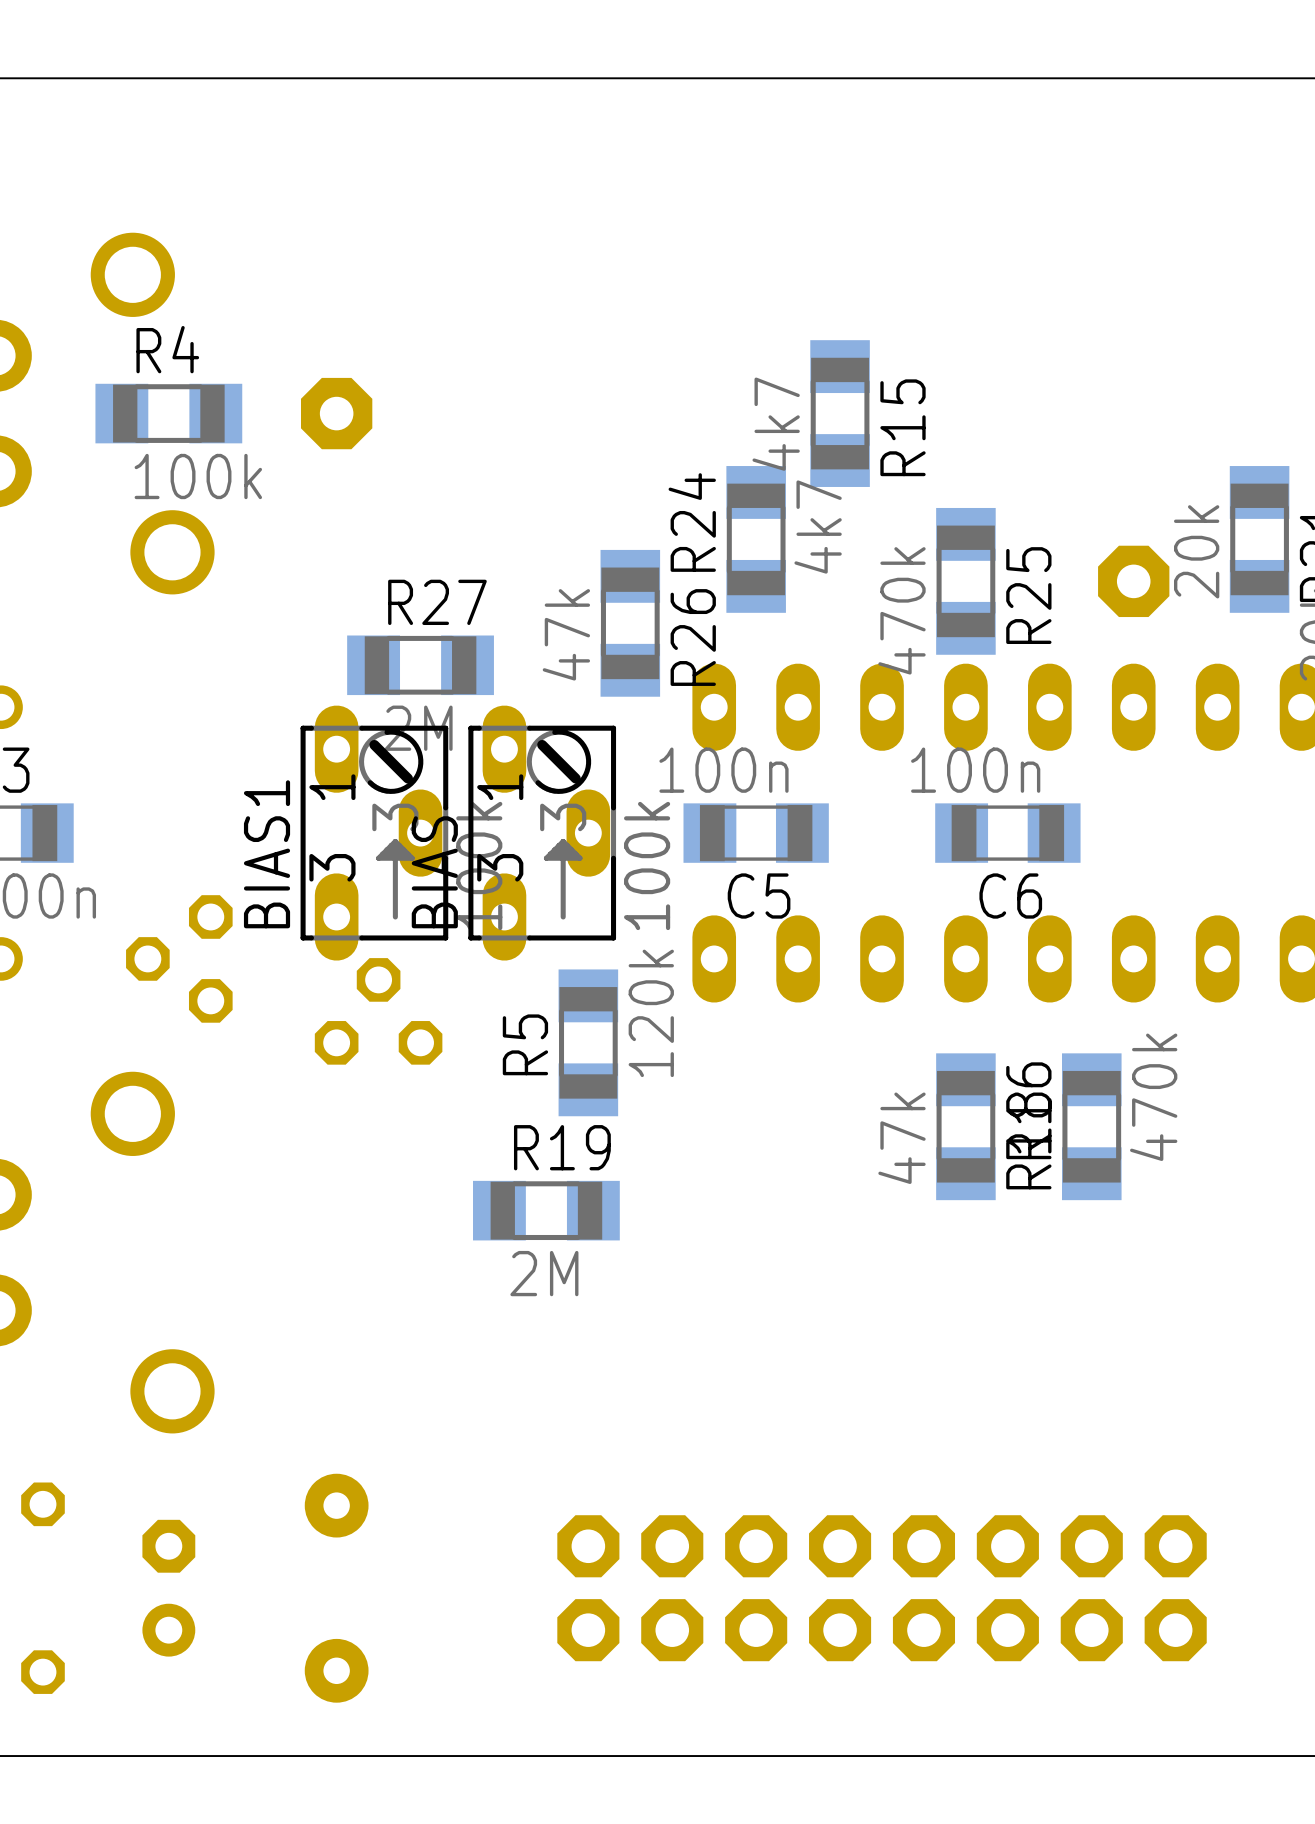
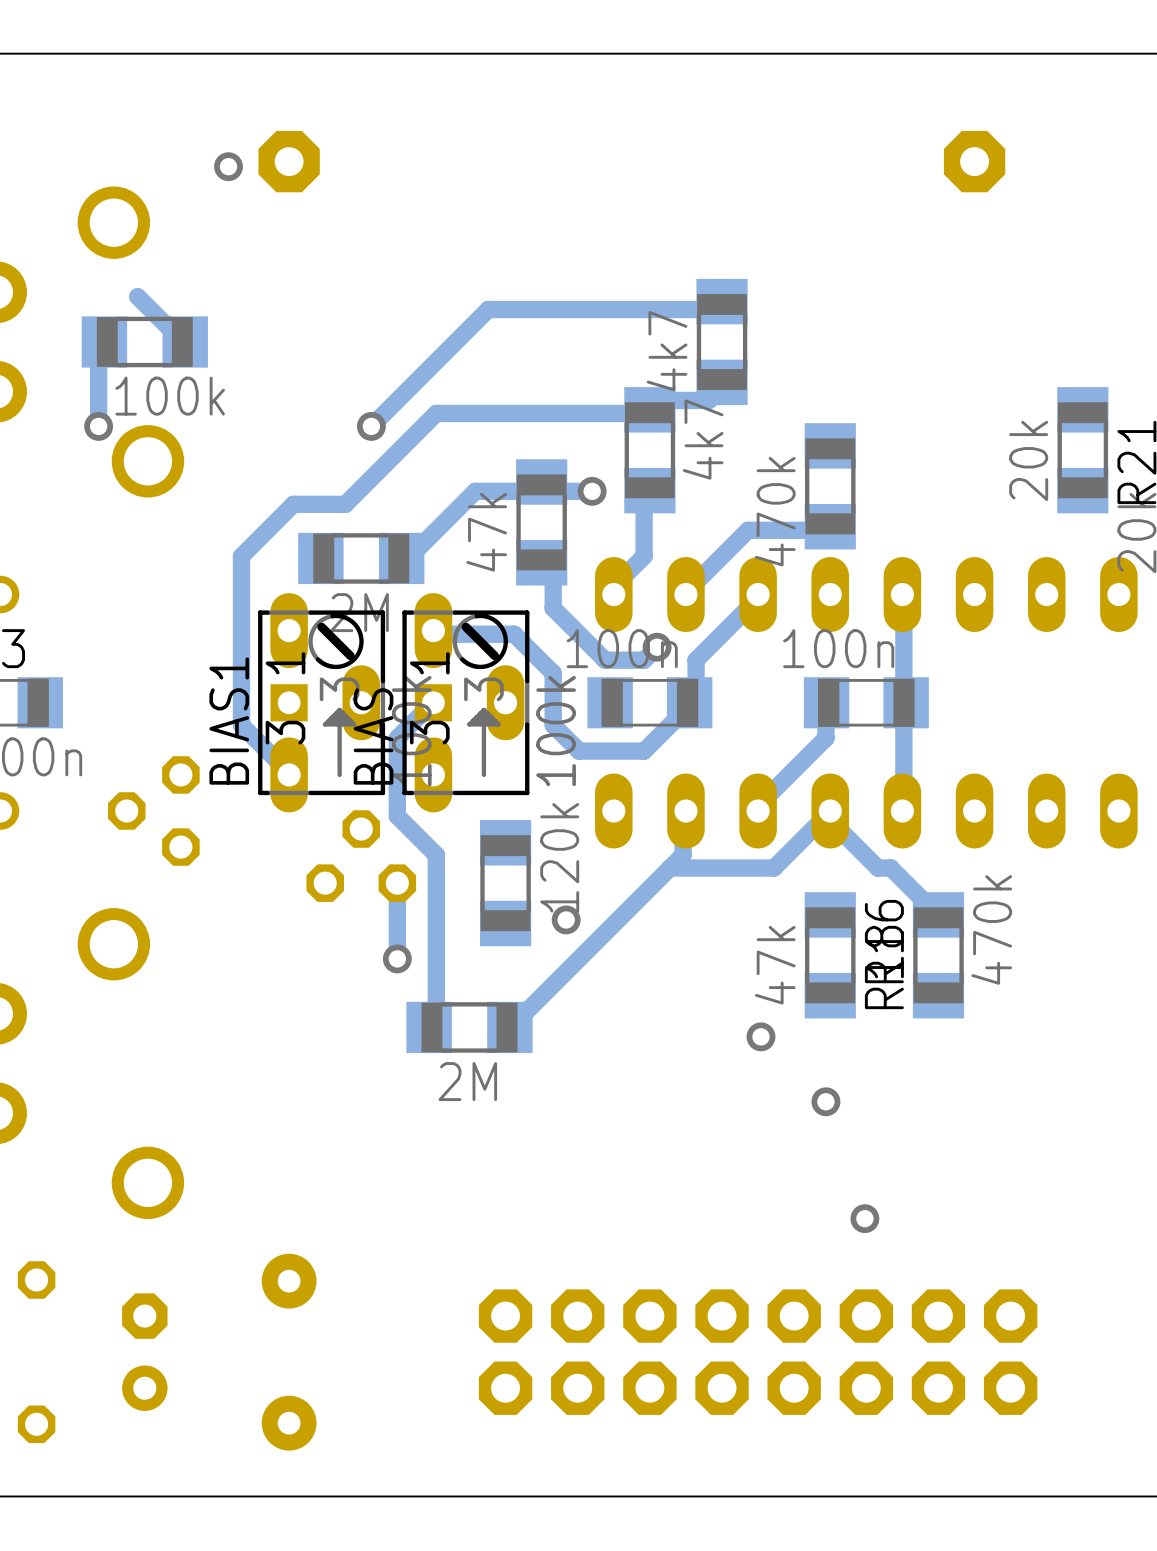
via: none -> (228, 166)
R4 name: R4 (167, 349) -> none
track: none -> (137, 296) (185, 342)
track: none -> (722, 301) (722, 309) (488, 309) (371, 426)
track: none -> (104, 342) (98, 348) (98, 426)
part position: (336, 413) -> (289, 161)
R15 name: R15 (902, 427) -> none
track: none -> (722, 382) (722, 387) (709, 400) (657, 400) (649, 409) (644, 413) (436, 413) (345, 504) (293, 504) (241, 556) (241, 725) (289, 774)
via: none -> (98, 426)
via: none -> (371, 426)
R24 name: R24 (692, 522) -> none
part position: (1133, 581) -> (974, 161)
track: none -> (649, 490) (644, 491) (644, 556) (618, 582) (613, 594)
track: none -> (592, 491) (553, 491) (541, 481) (540, 491) (475, 491) (410, 556) (401, 558)
via: none -> (592, 491)
R25 name: R25 (1028, 595) -> none
R27 name: R27 (437, 602) -> none
track: none -> (830, 526) (825, 530) (748, 530) (685, 594)
R26 name: R26 (693, 637) -> none
track: none -> (541, 562) (553, 569) (553, 608) (605, 660) (644, 660) (657, 647)
BIAS1 footprint: [300, 705, 449, 961] -> [258, 593, 386, 813]
BIAS footprint: [468, 705, 617, 961] -> [402, 593, 530, 813]
track: none -> (758, 594) (761, 595) (696, 660) (696, 699) (689, 702) (683, 712) (644, 751) (579, 751) (553, 725) (553, 673) (514, 634) (436, 634) (433, 630)
track: none -> (902, 594) (903, 699) (906, 702) (903, 712) (902, 811)
via: none -> (657, 647)
track: none -> (433, 702) (397, 738) (397, 816) (436, 855) (436, 1023) (429, 1027)
track: none -> (826, 702) (825, 738) (761, 803) (758, 811)
C5 name: C5 (759, 896) -> none
C6 name: C6 (1010, 896) -> none
track: none -> (685, 811) (683, 816) (683, 855) (509, 1027)
track: none -> (825, 816) (877, 868) (890, 868) (938, 914)
track: none -> (825, 816) (773, 868) (670, 868)
part position: (378, 1011) -> (361, 856)
track: none -> (397, 883) (397, 958)
R5 name: R5 (525, 1044) -> none
via: none -> (566, 919)
via: none -> (397, 958)
R19 name: R19 (562, 1147) -> none
via: none -> (761, 1036)
via: none -> (825, 1101)
via: none -> (864, 1218)

